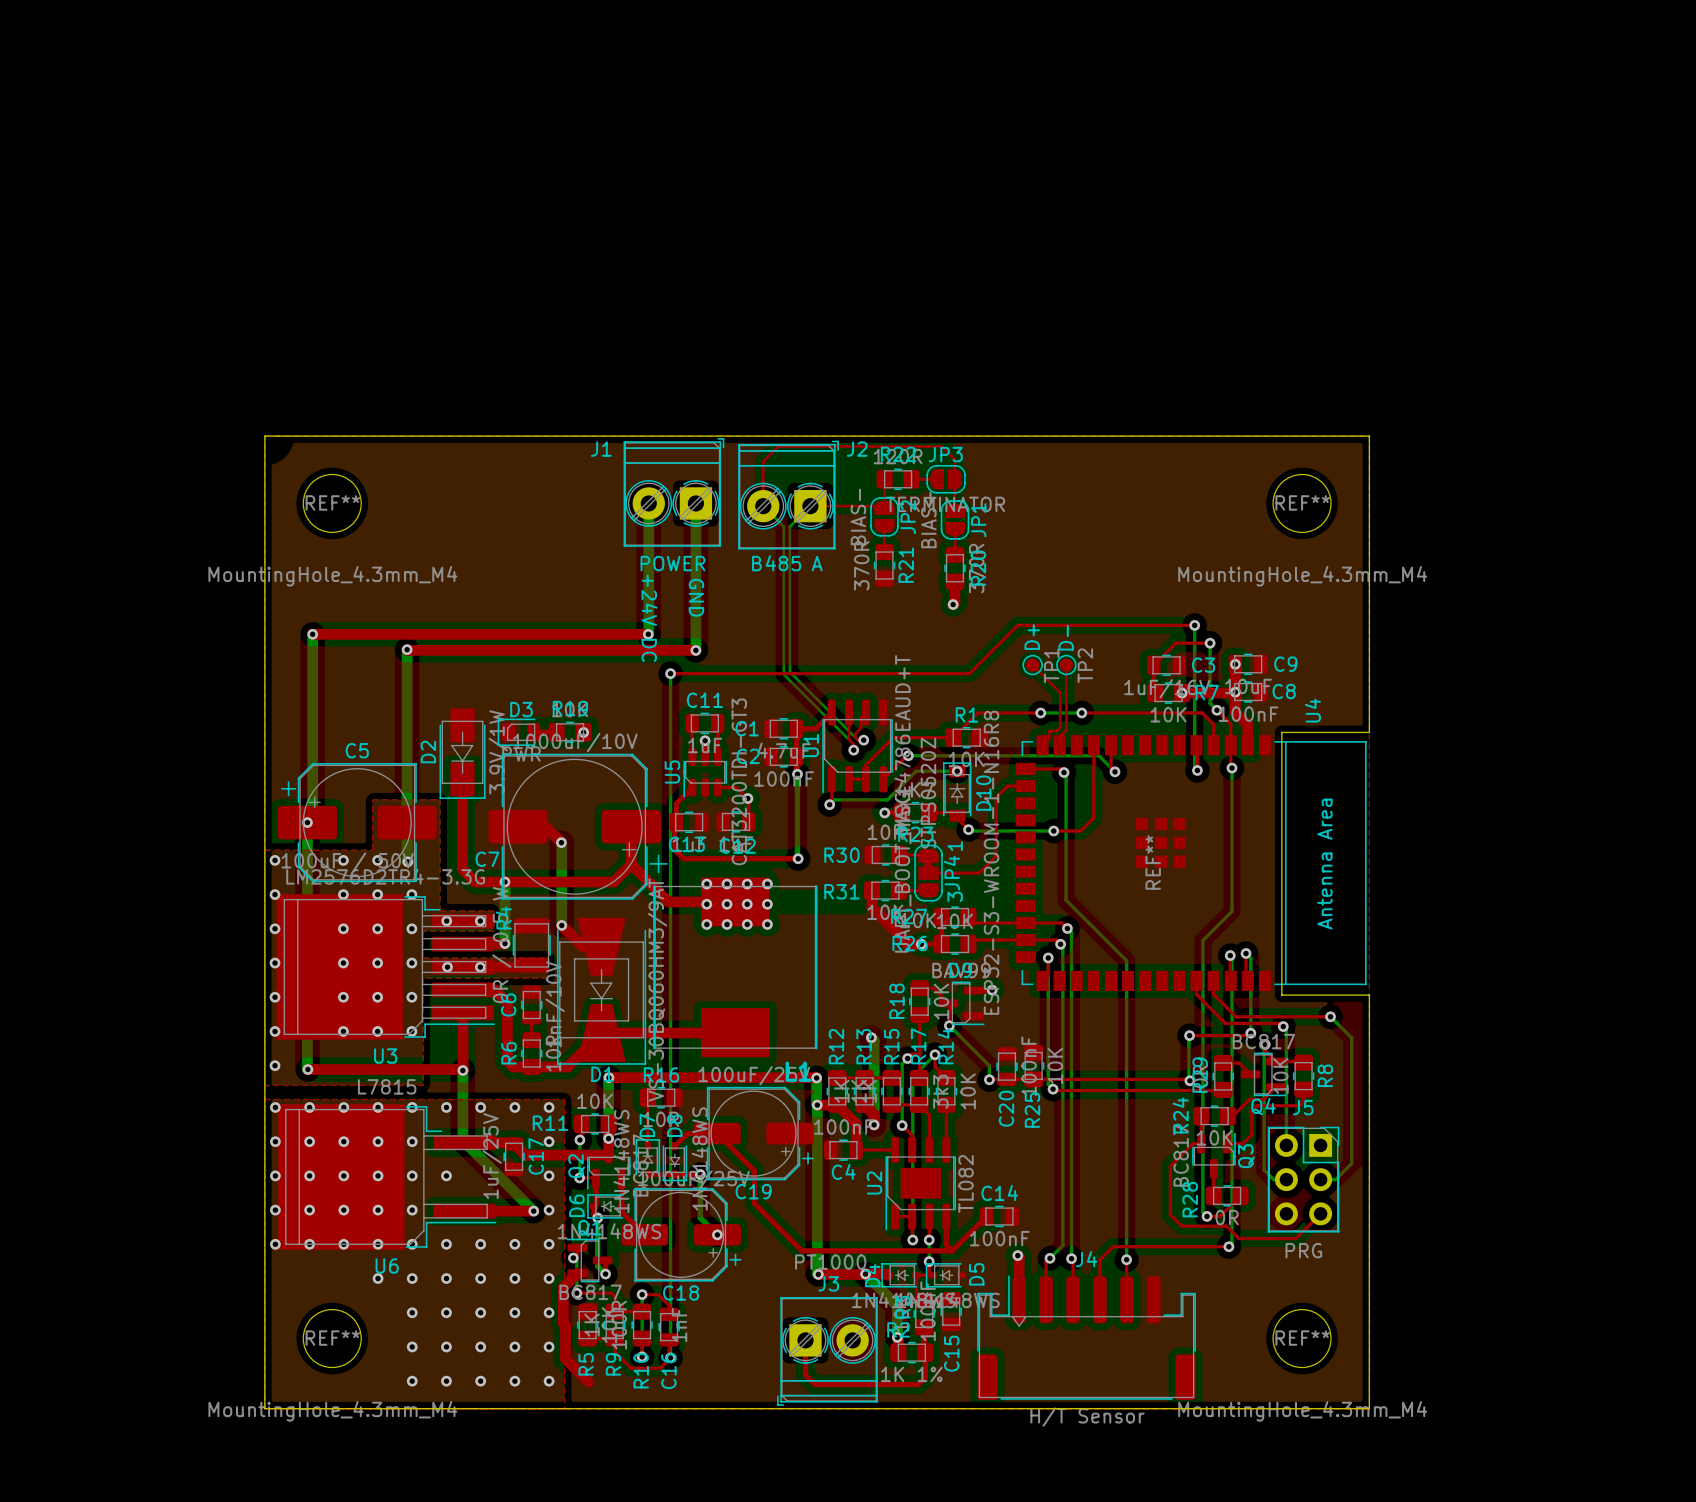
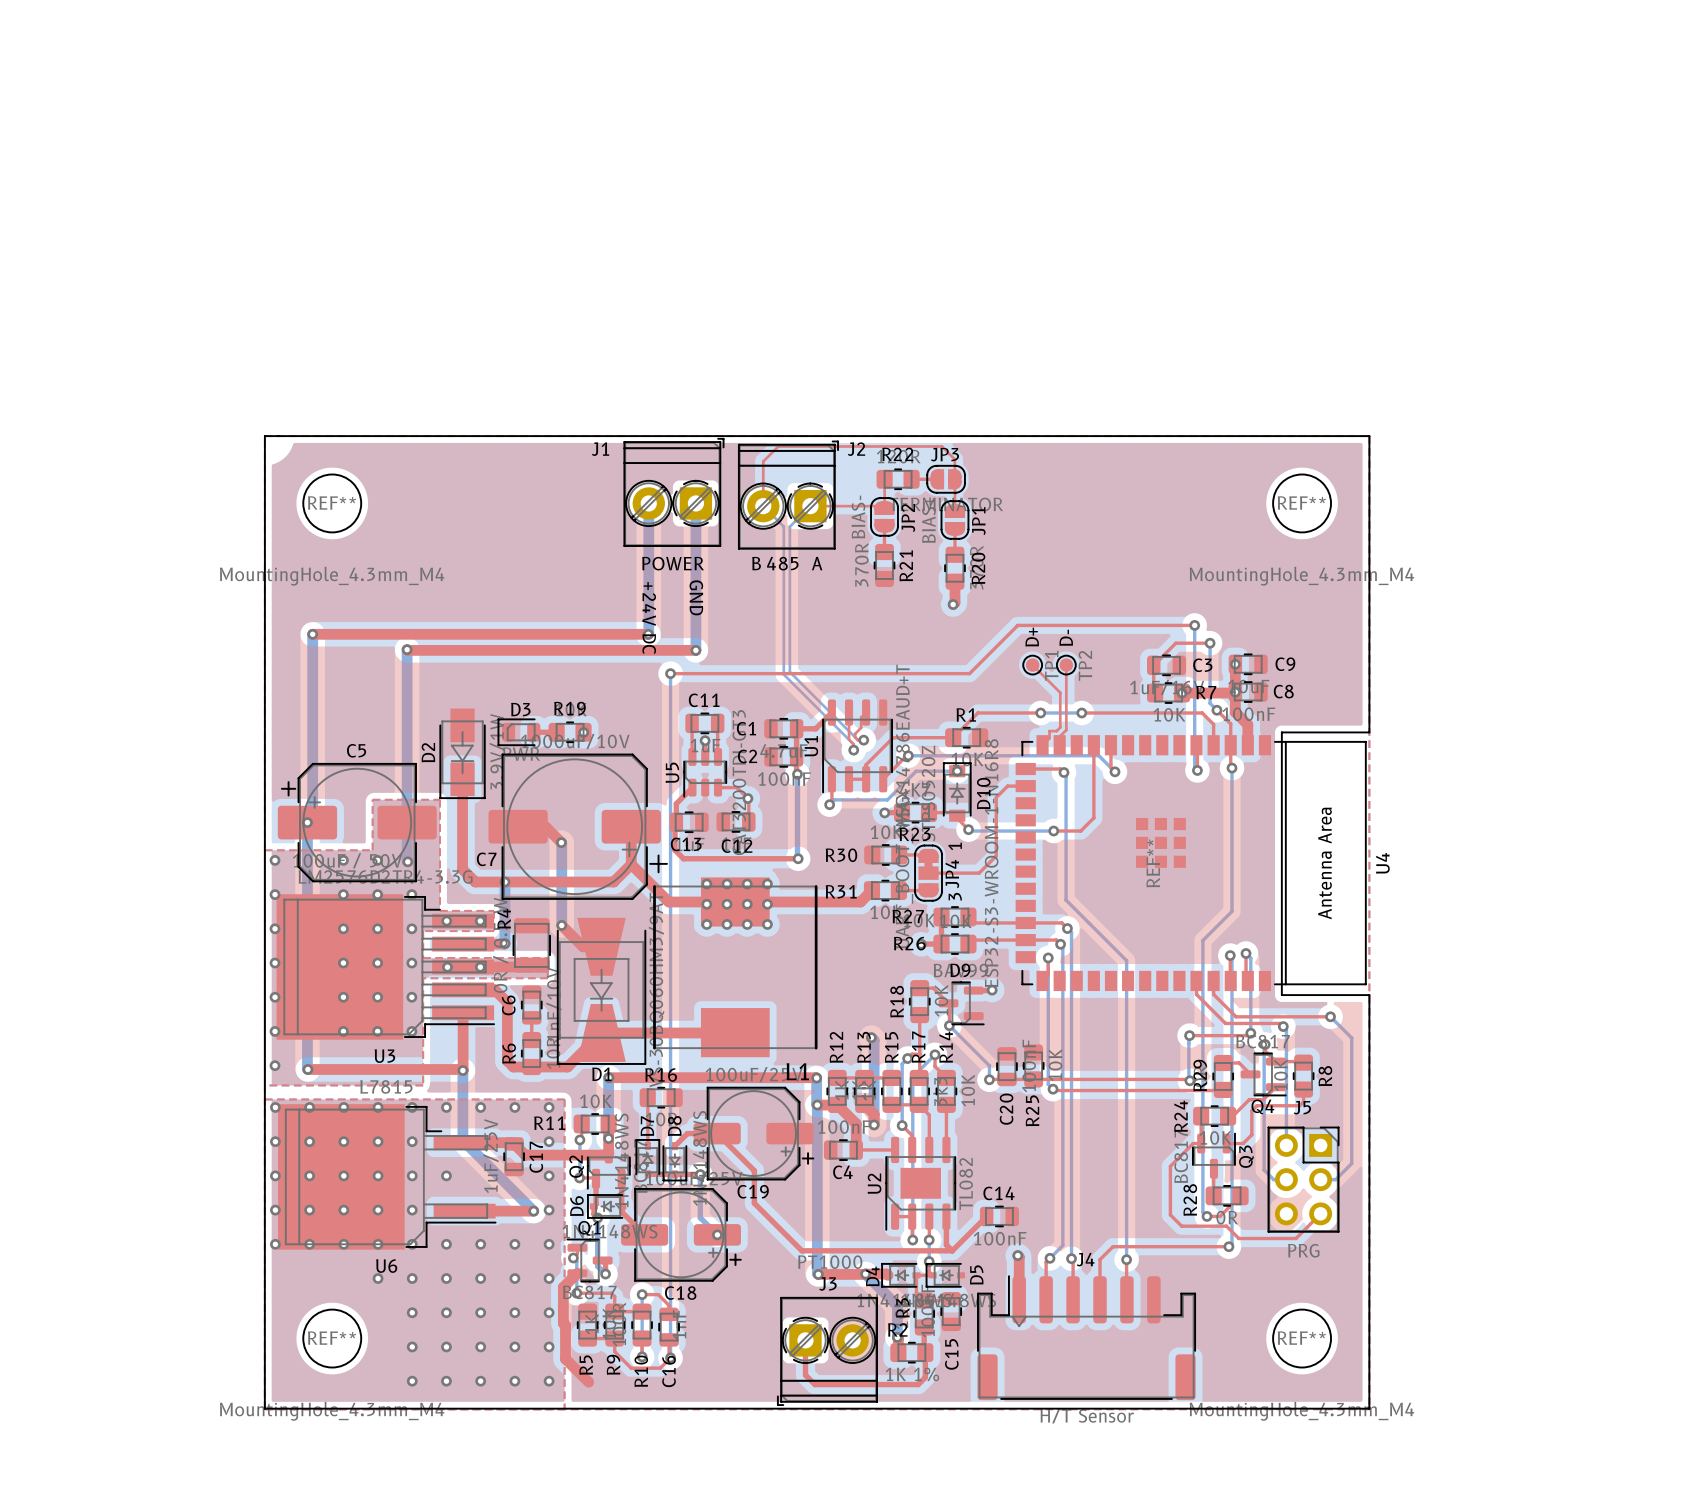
U4 name position: U4 (1312, 710) -> U4 (1382, 863)
top track: (871, 890) (871, 907) (908, 944) (921, 944) -> (871, 890) (860, 901) (735, 901)

